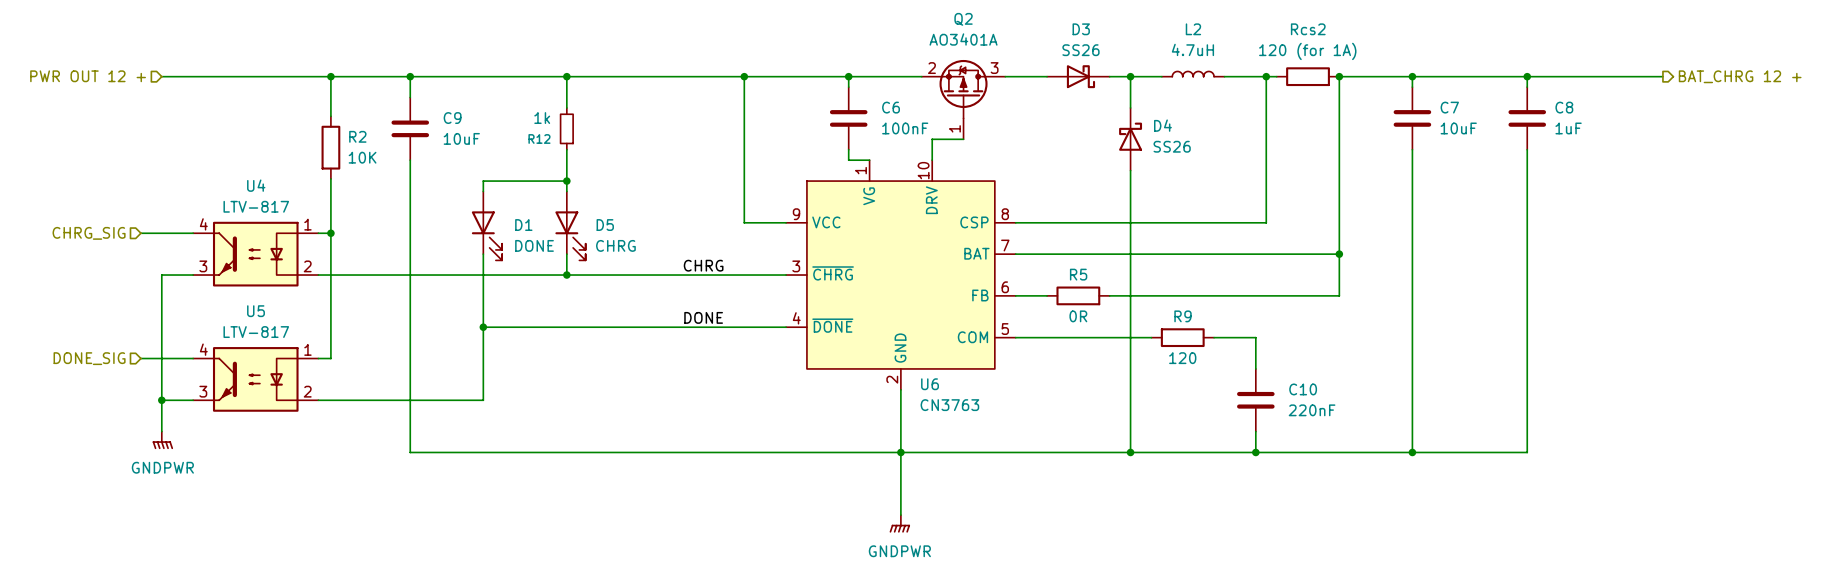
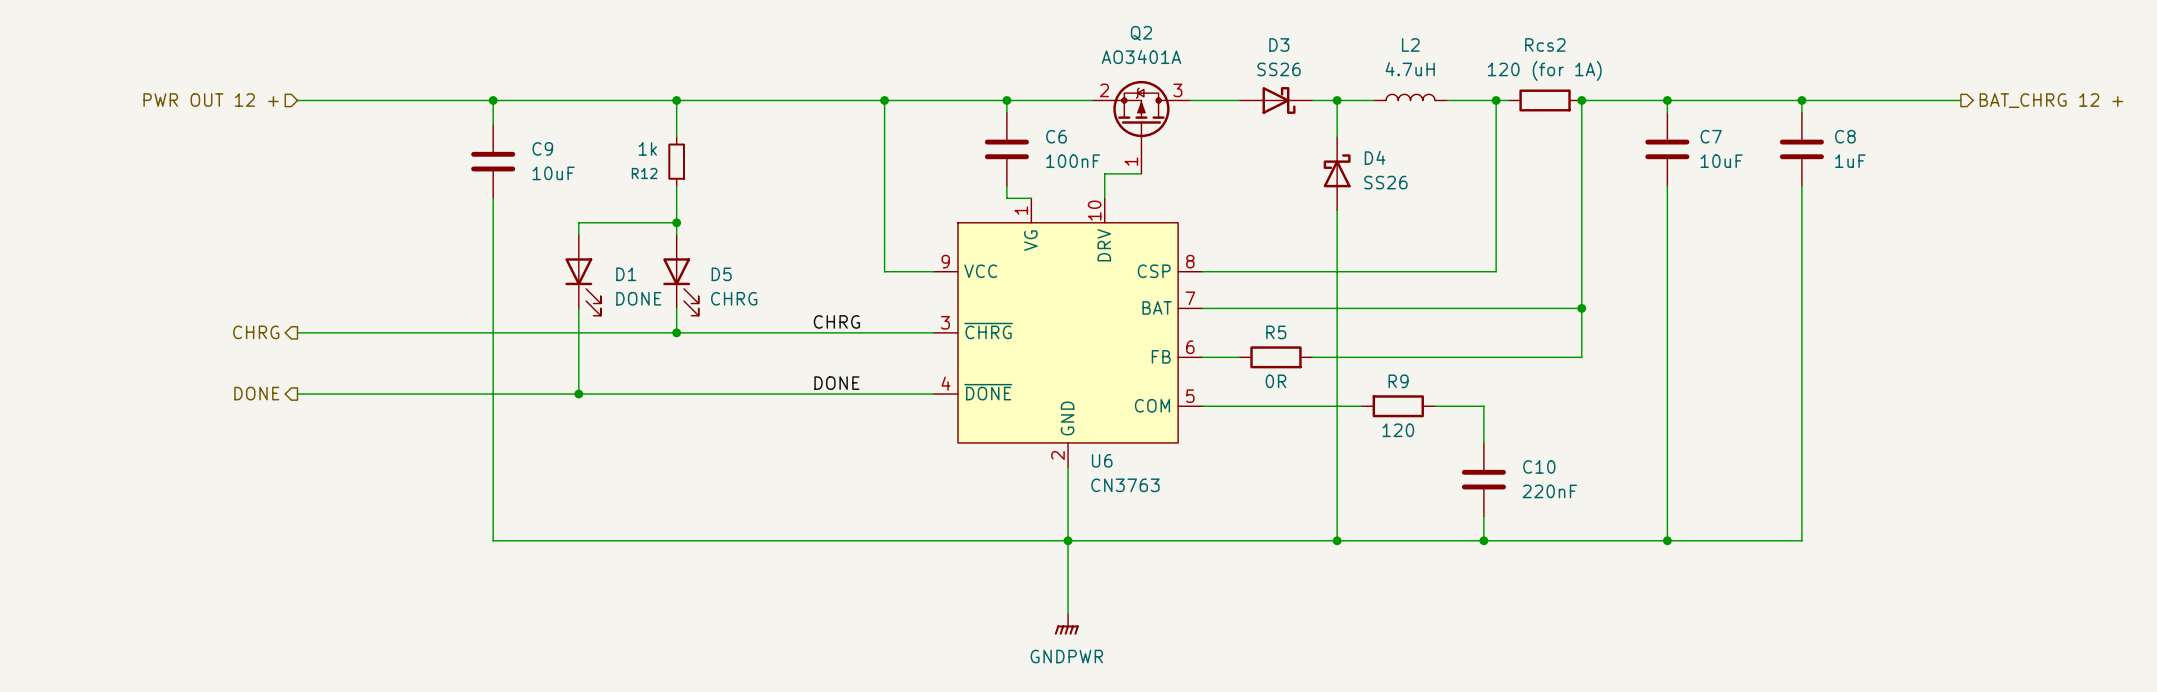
hierarchical label position: PWR OUT 12 + (88, 76) -> PWR OUT 12 + (211, 100)
wire: (161, 76) (243, 76) -> none
wire: (330, 76) (330, 116) -> none
junction: (330, 76) -> none
R2: 10K (330, 147) -> none
wire: (330, 178) (330, 358) (318, 358) -> none
hierarchical label: CHRG_SIG (89, 233) -> none
wire: (140, 233) (193, 233) -> none
wire: (318, 233) (330, 233) -> none
junction: (330, 233) -> none
U4: LTV-817 (255, 254) -> none
hierarchical label: none -> CHRG (256, 332)
wire: (193, 275) (161, 275) (161, 431) -> none
hierarchical label: none -> DONE (256, 393)
wire: (483, 327) (483, 400) (318, 400) -> (578, 394) (297, 394)
hierarchical label: DONE_SIG (89, 358) -> none
wire: (140, 358) (193, 358) -> none
U5: LTV-817 (255, 379) -> none
wire: (161, 400) (193, 400) -> none
junction: (161, 400) -> none
power symbol: GNDPWR (162, 440) -> none

